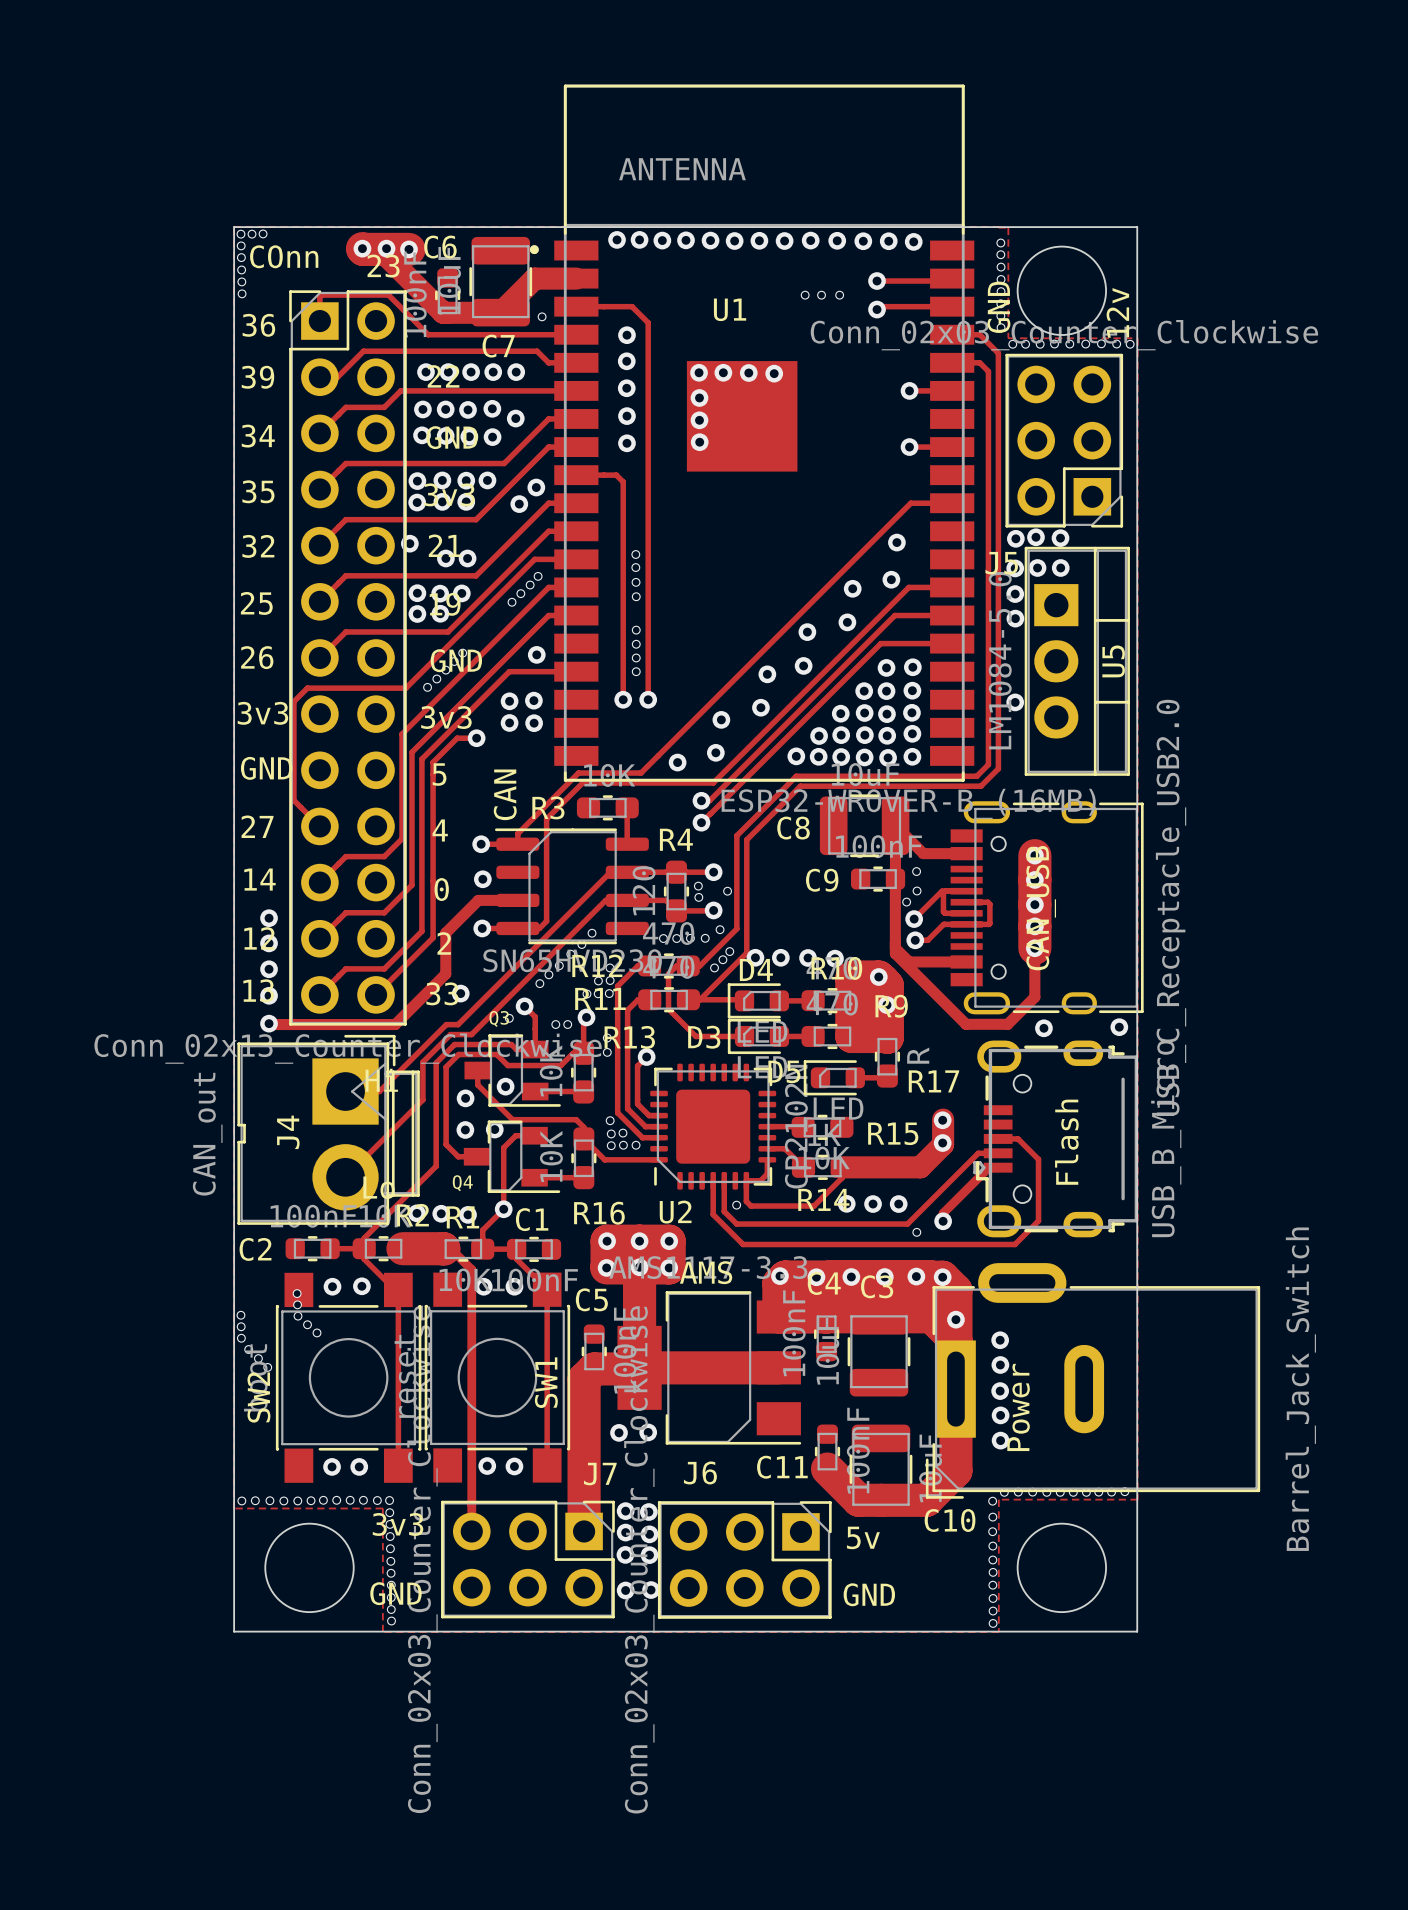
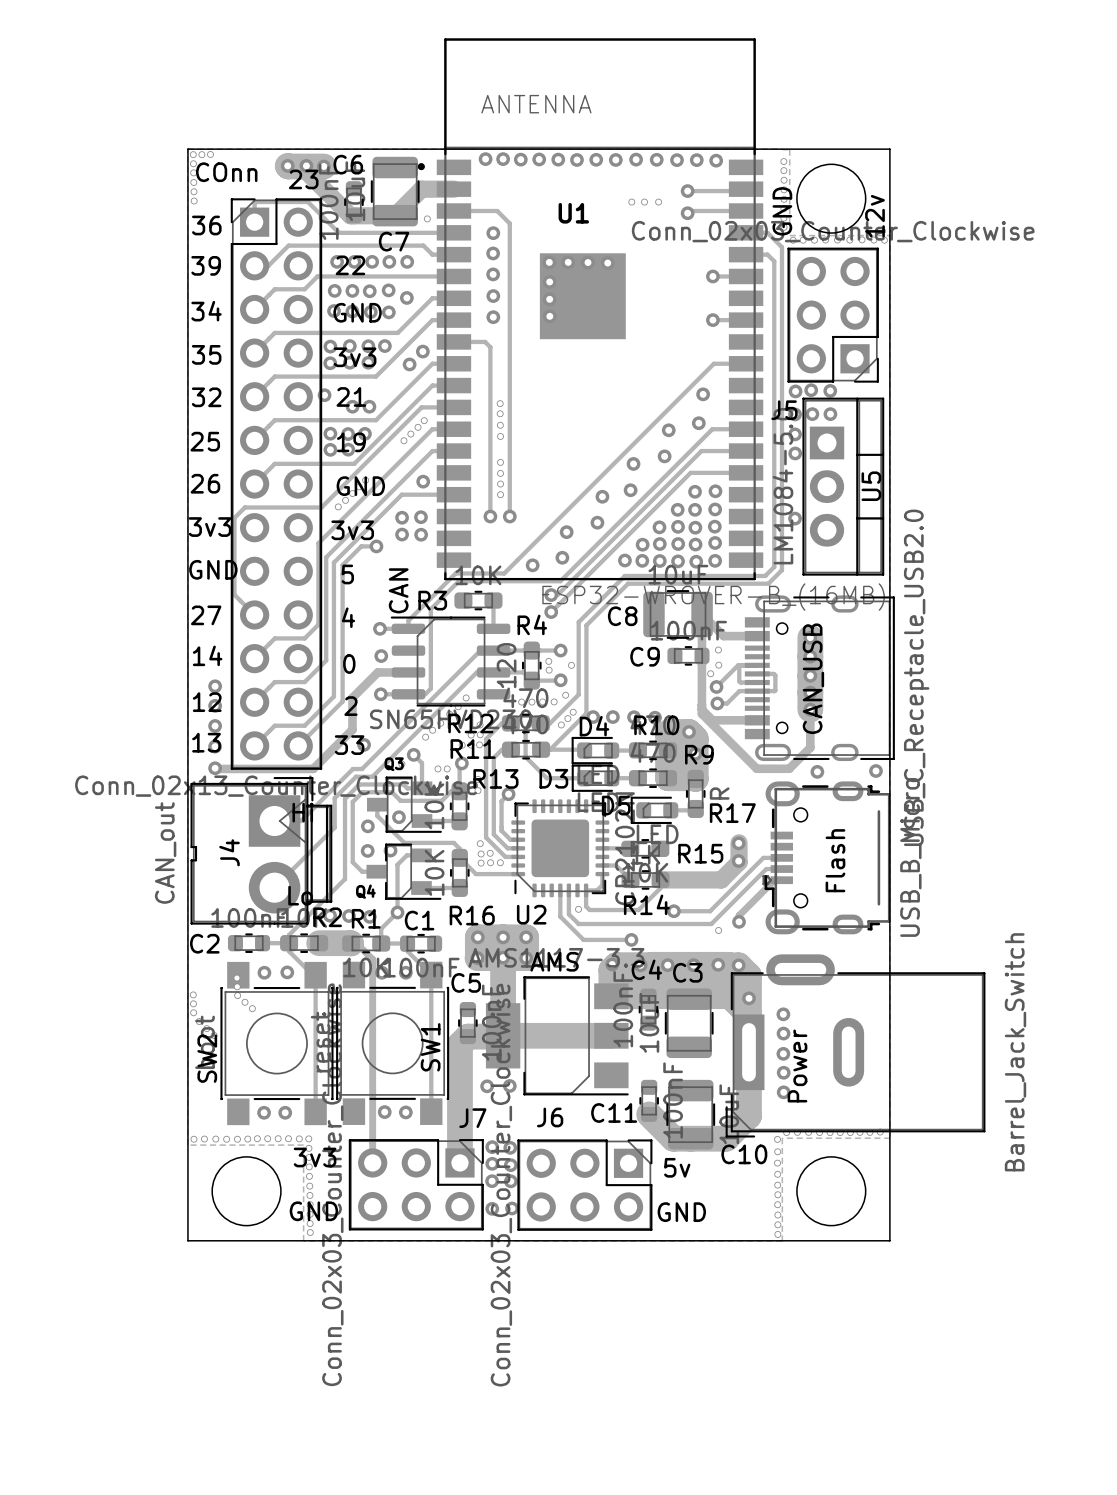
track: (998, 1138) (1018, 1138) (1038, 1159) (1038, 1220) (1014, 1244) (804, 1244) -> (781, 857) (763, 857) (710, 911) (673, 911)
via: (846, 1203) -> none
via: (873, 1204) -> none
via: (898, 1204) -> none
via: none -> (673, 911)
via: none -> (631, 939)

